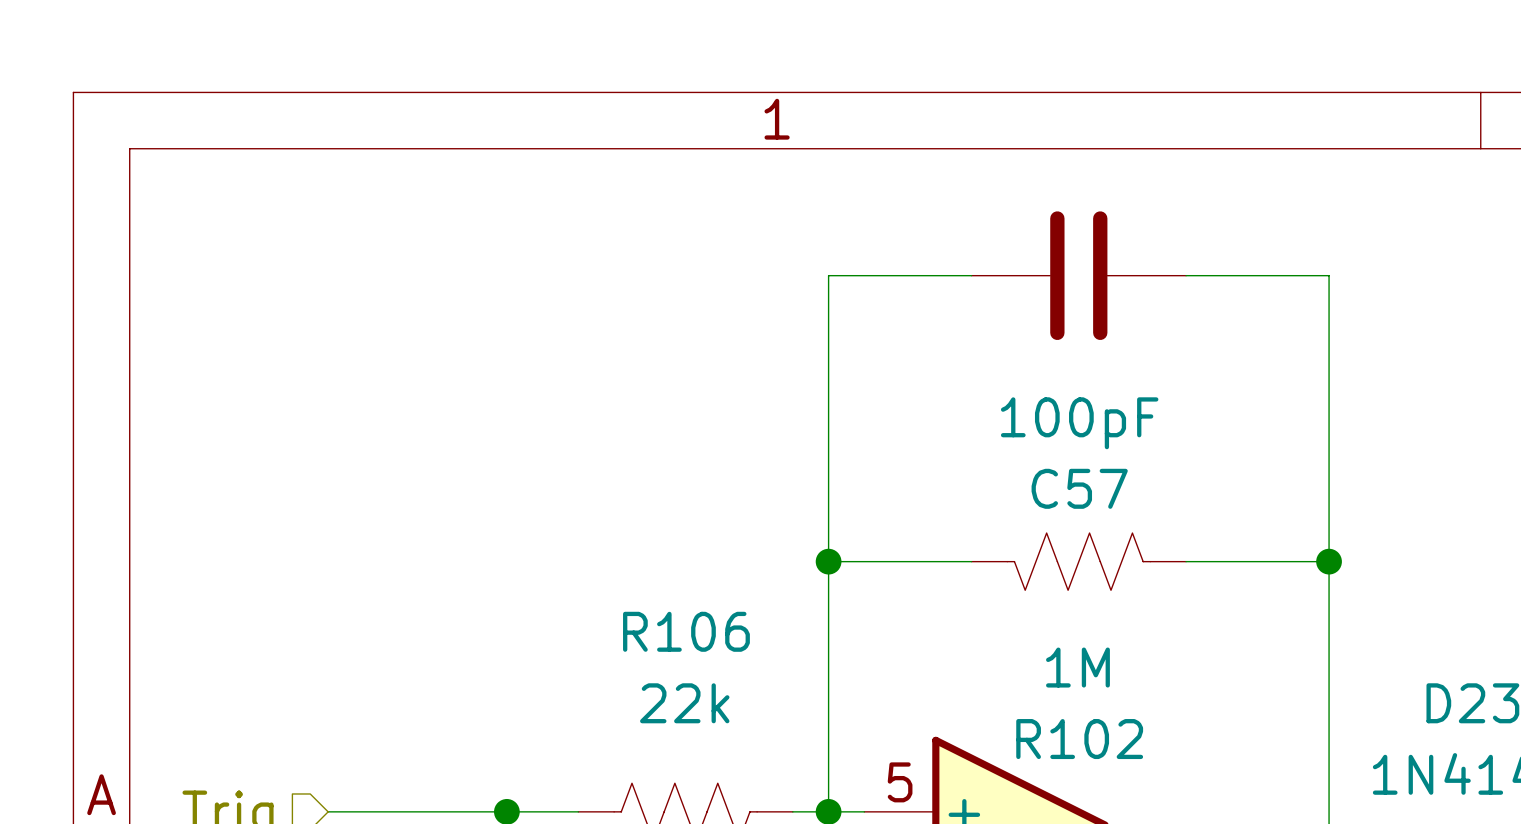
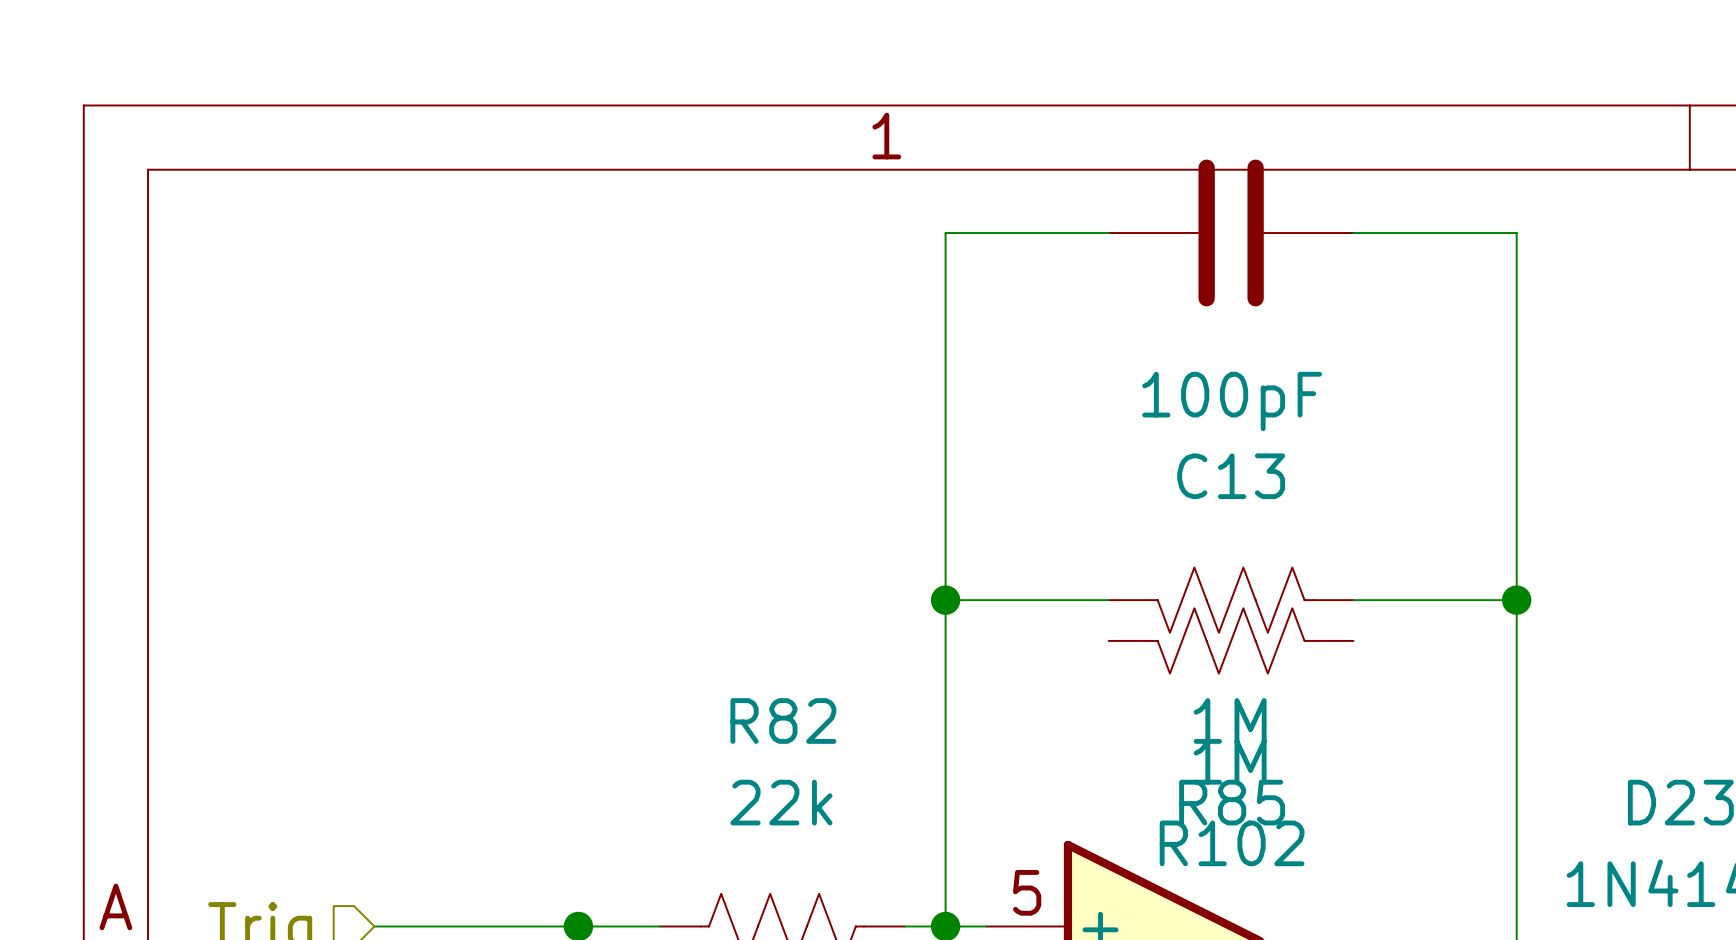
C13: none -> 100pF (1231, 233)
wire: (828, 275) (971, 275) -> (945, 314) (945, 233) (1108, 233)
C57: 100pF (1078, 275) -> none
wire: (1186, 275) (1329, 275) -> (1353, 233) (1516, 233) (1516, 314)
R85: none -> 1M (1231, 600)
wire: (828, 561) (971, 561) -> (945, 600) (1108, 600)
junction position: (828, 561) -> (945, 600)
wire: (1186, 561) (1329, 561) -> (1353, 600) (1516, 600)
junction position: (1329, 561) -> (1516, 600)
R106 name: R106 (686, 631) -> R82 (783, 720)

